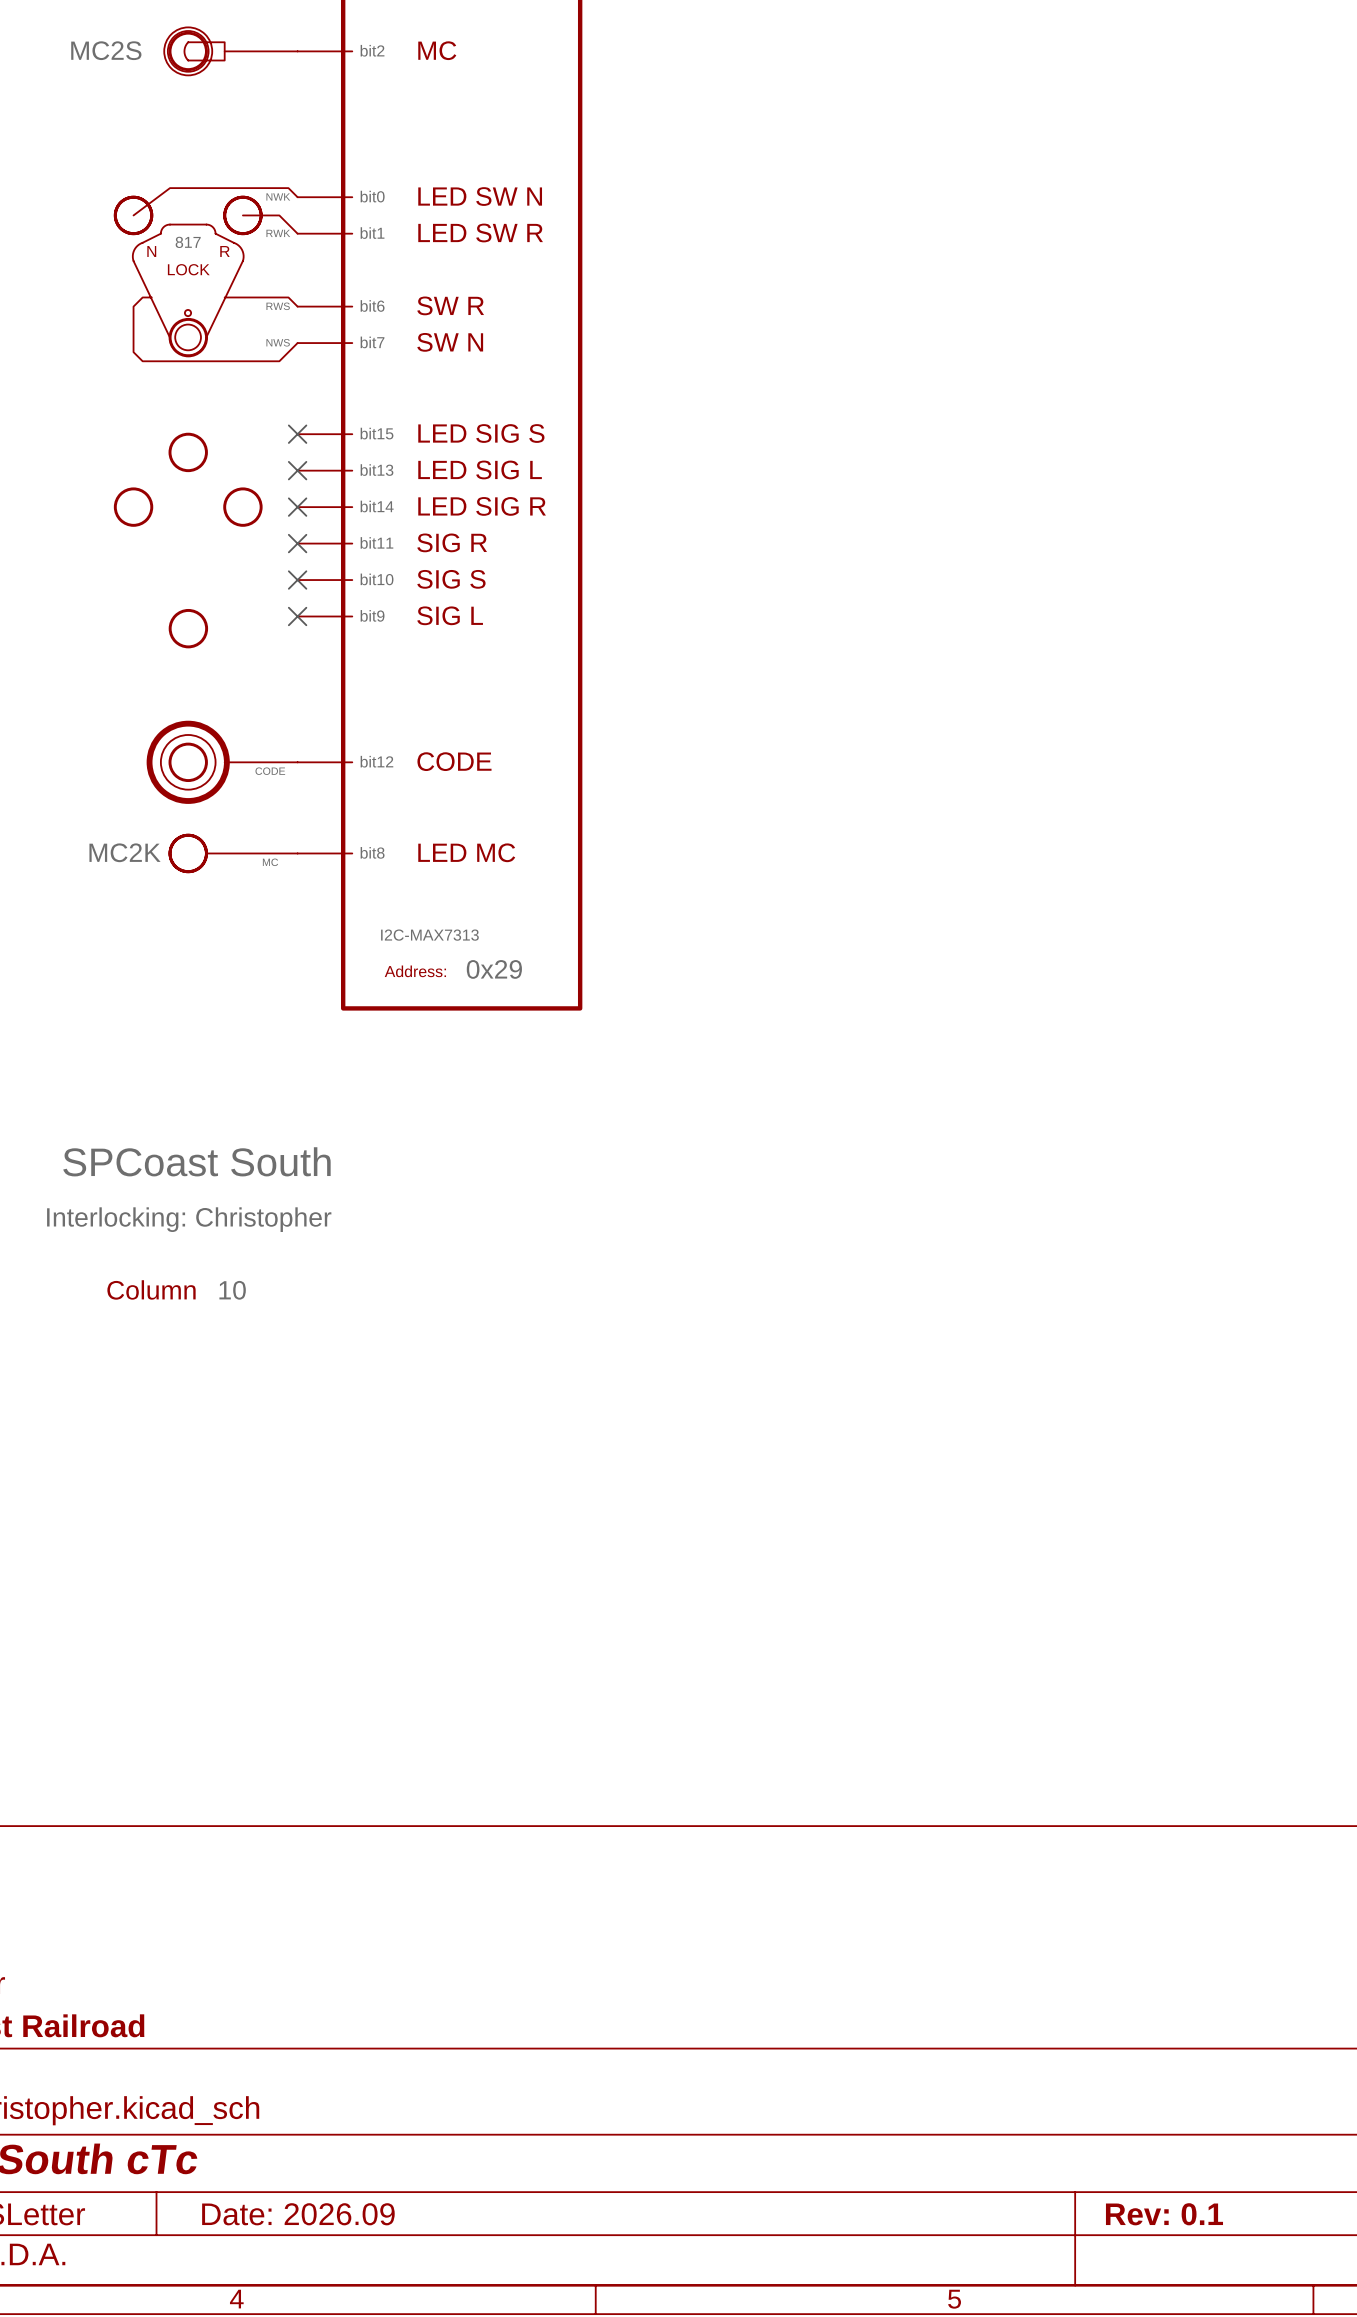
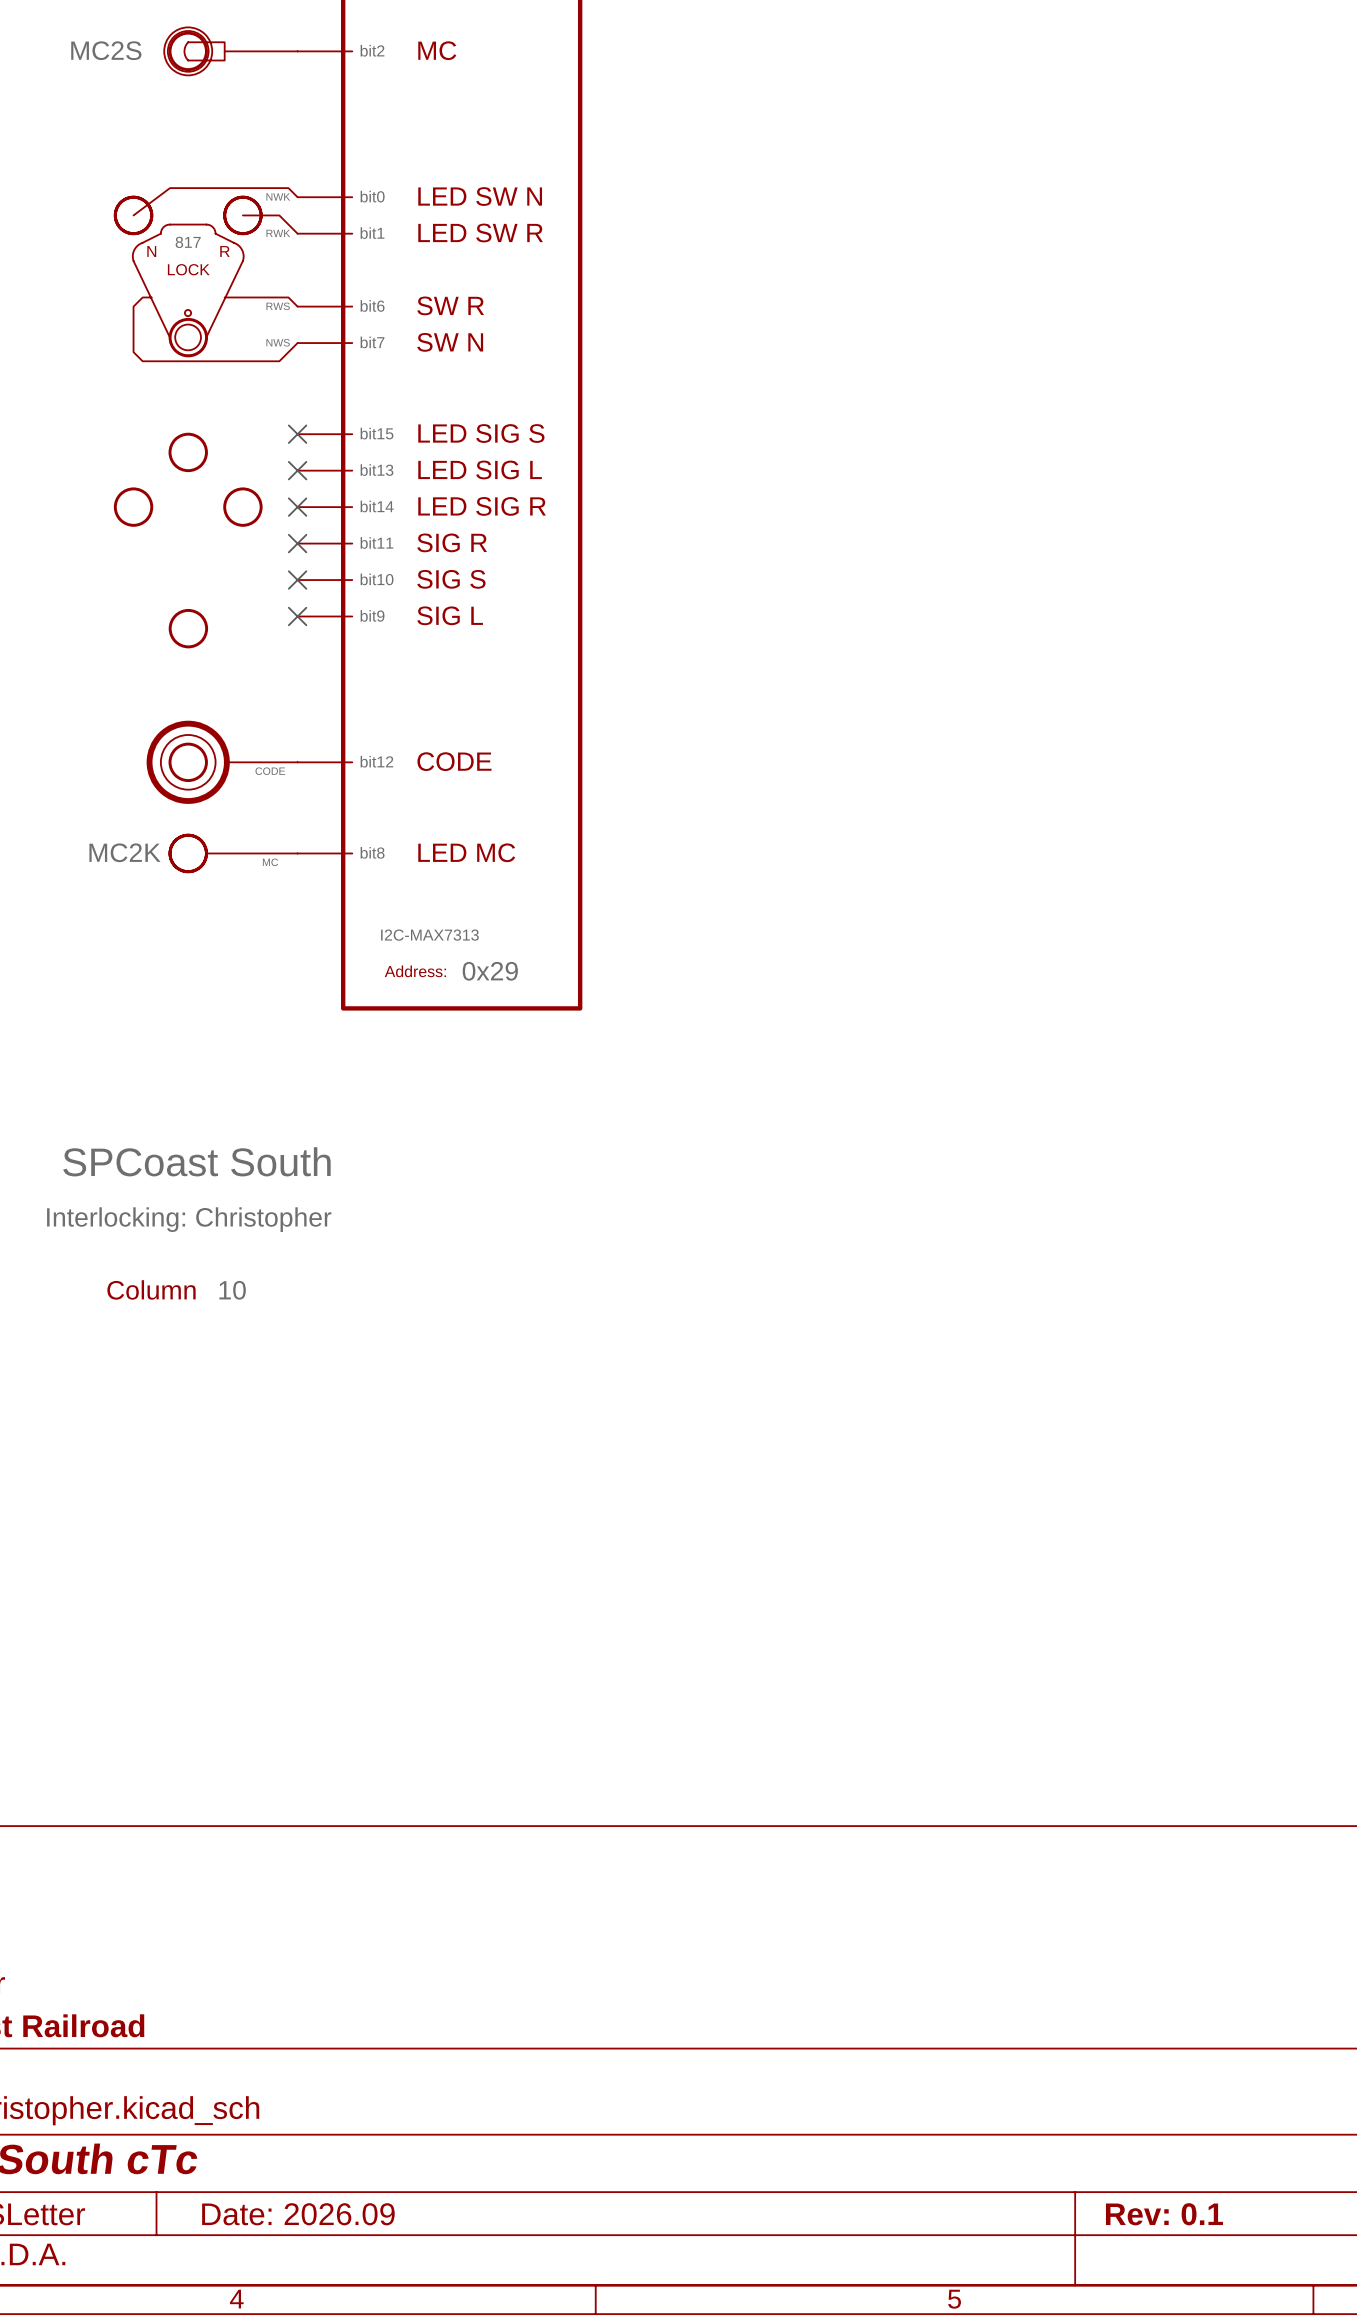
part text: 0x29 (494, 969) -> none
part value: none -> 0x29 (490, 971)

